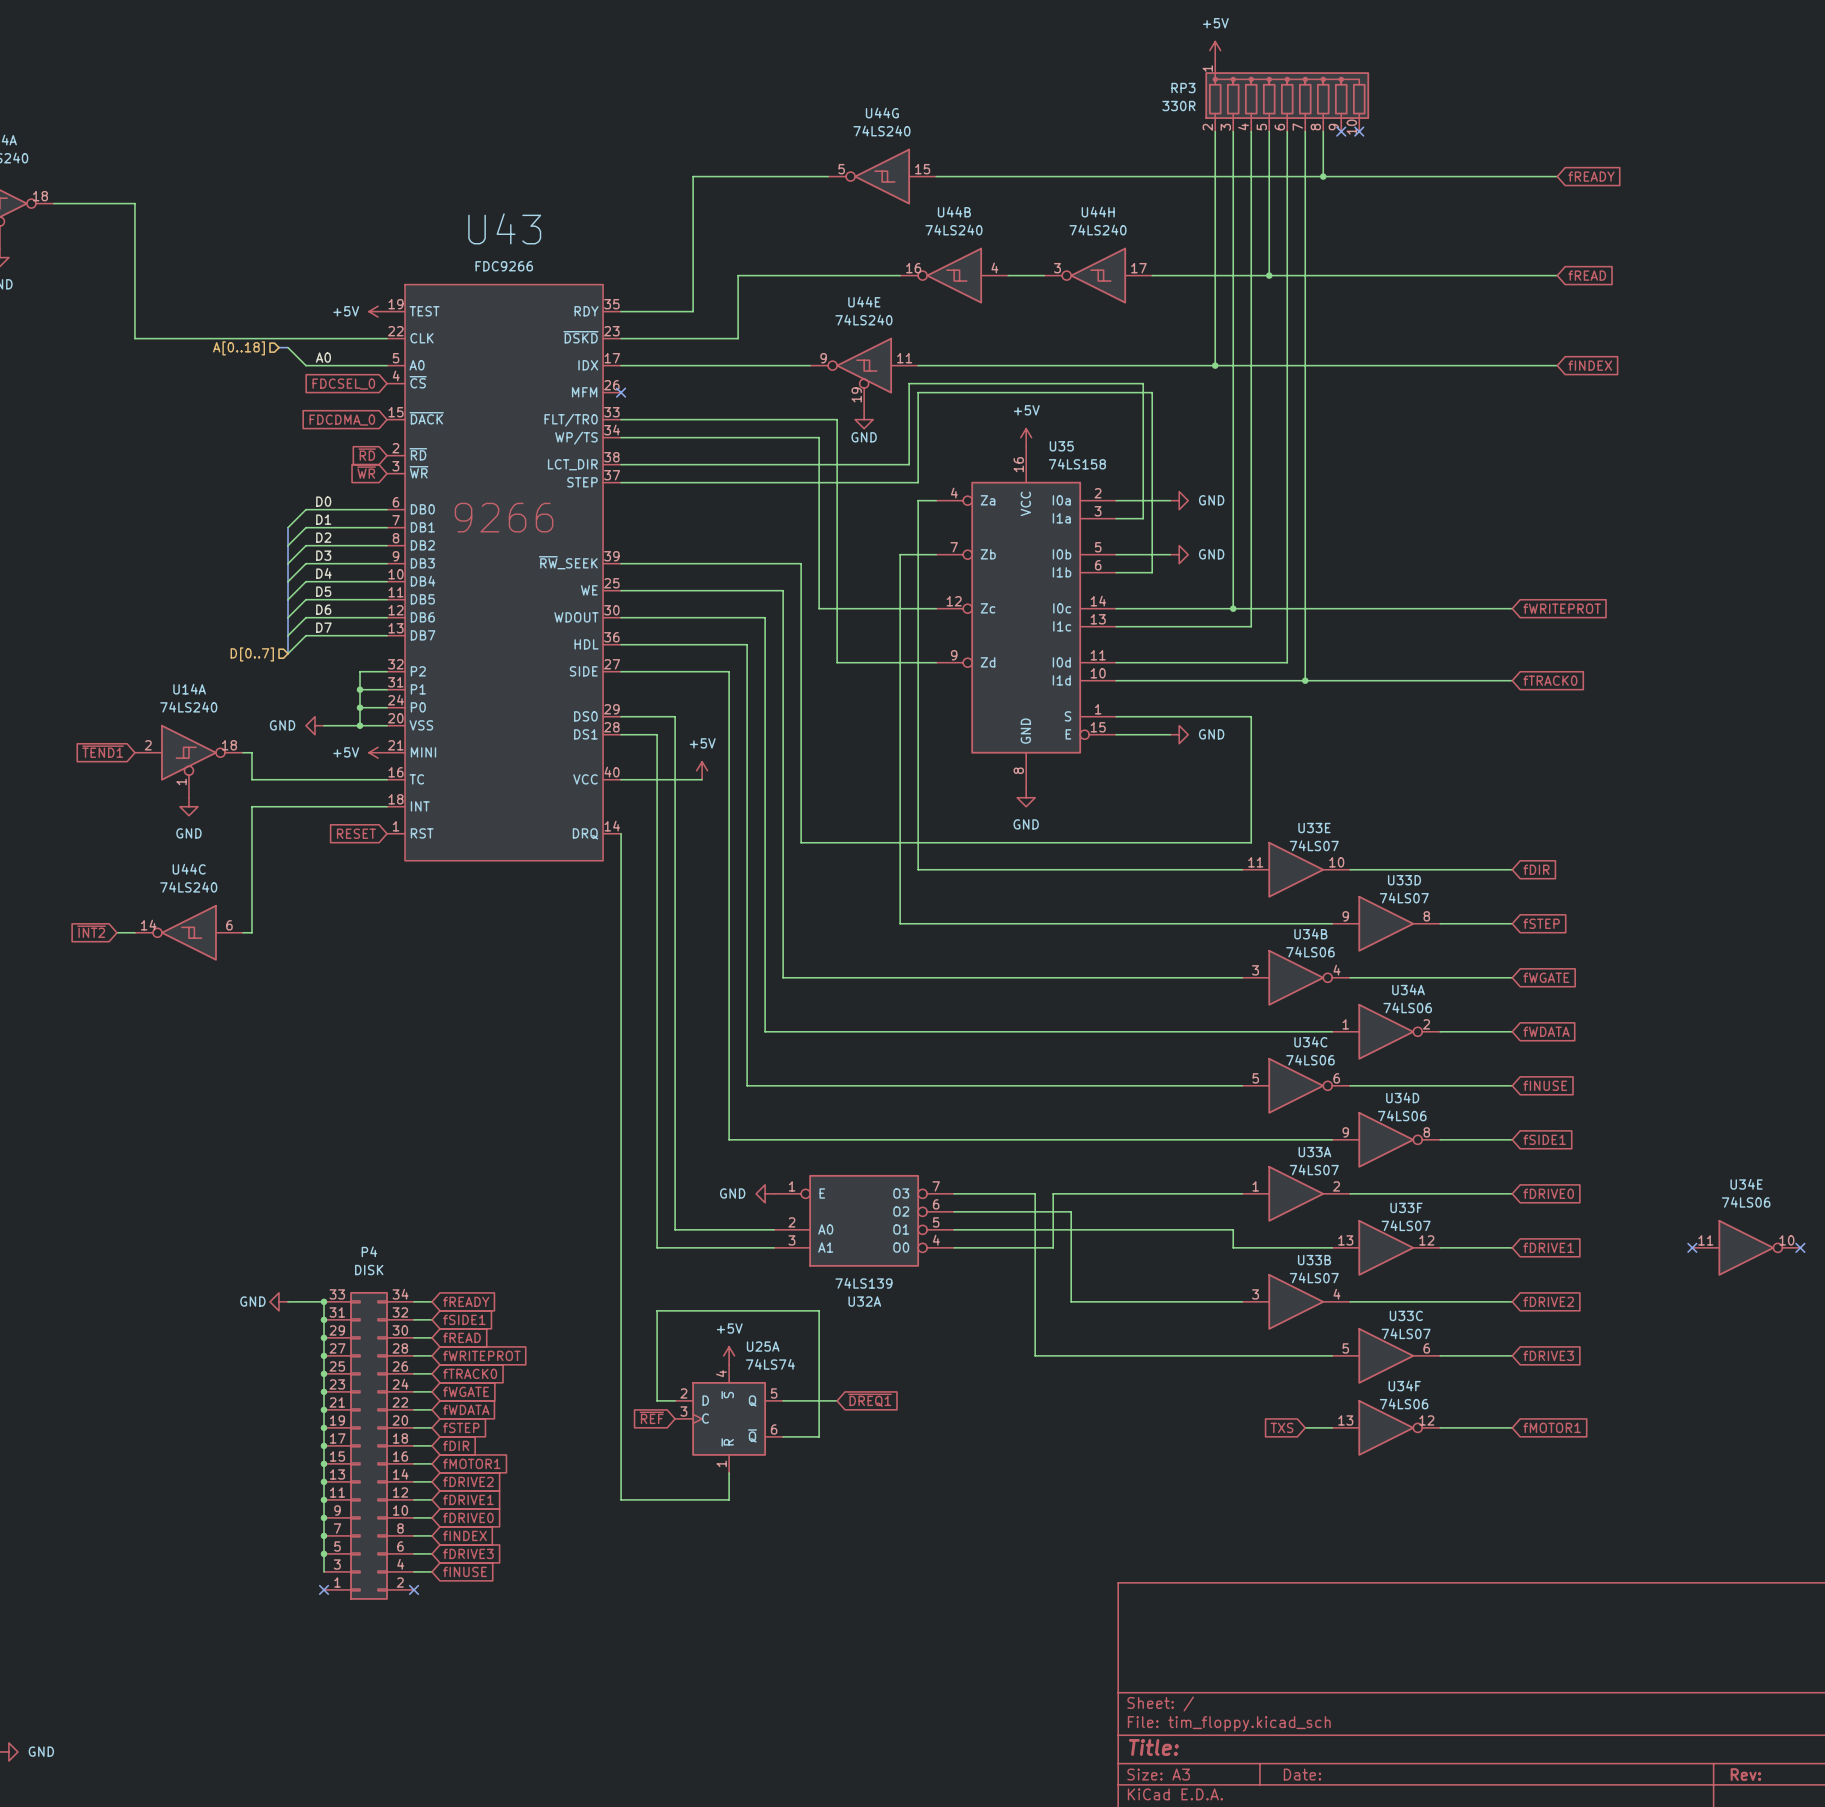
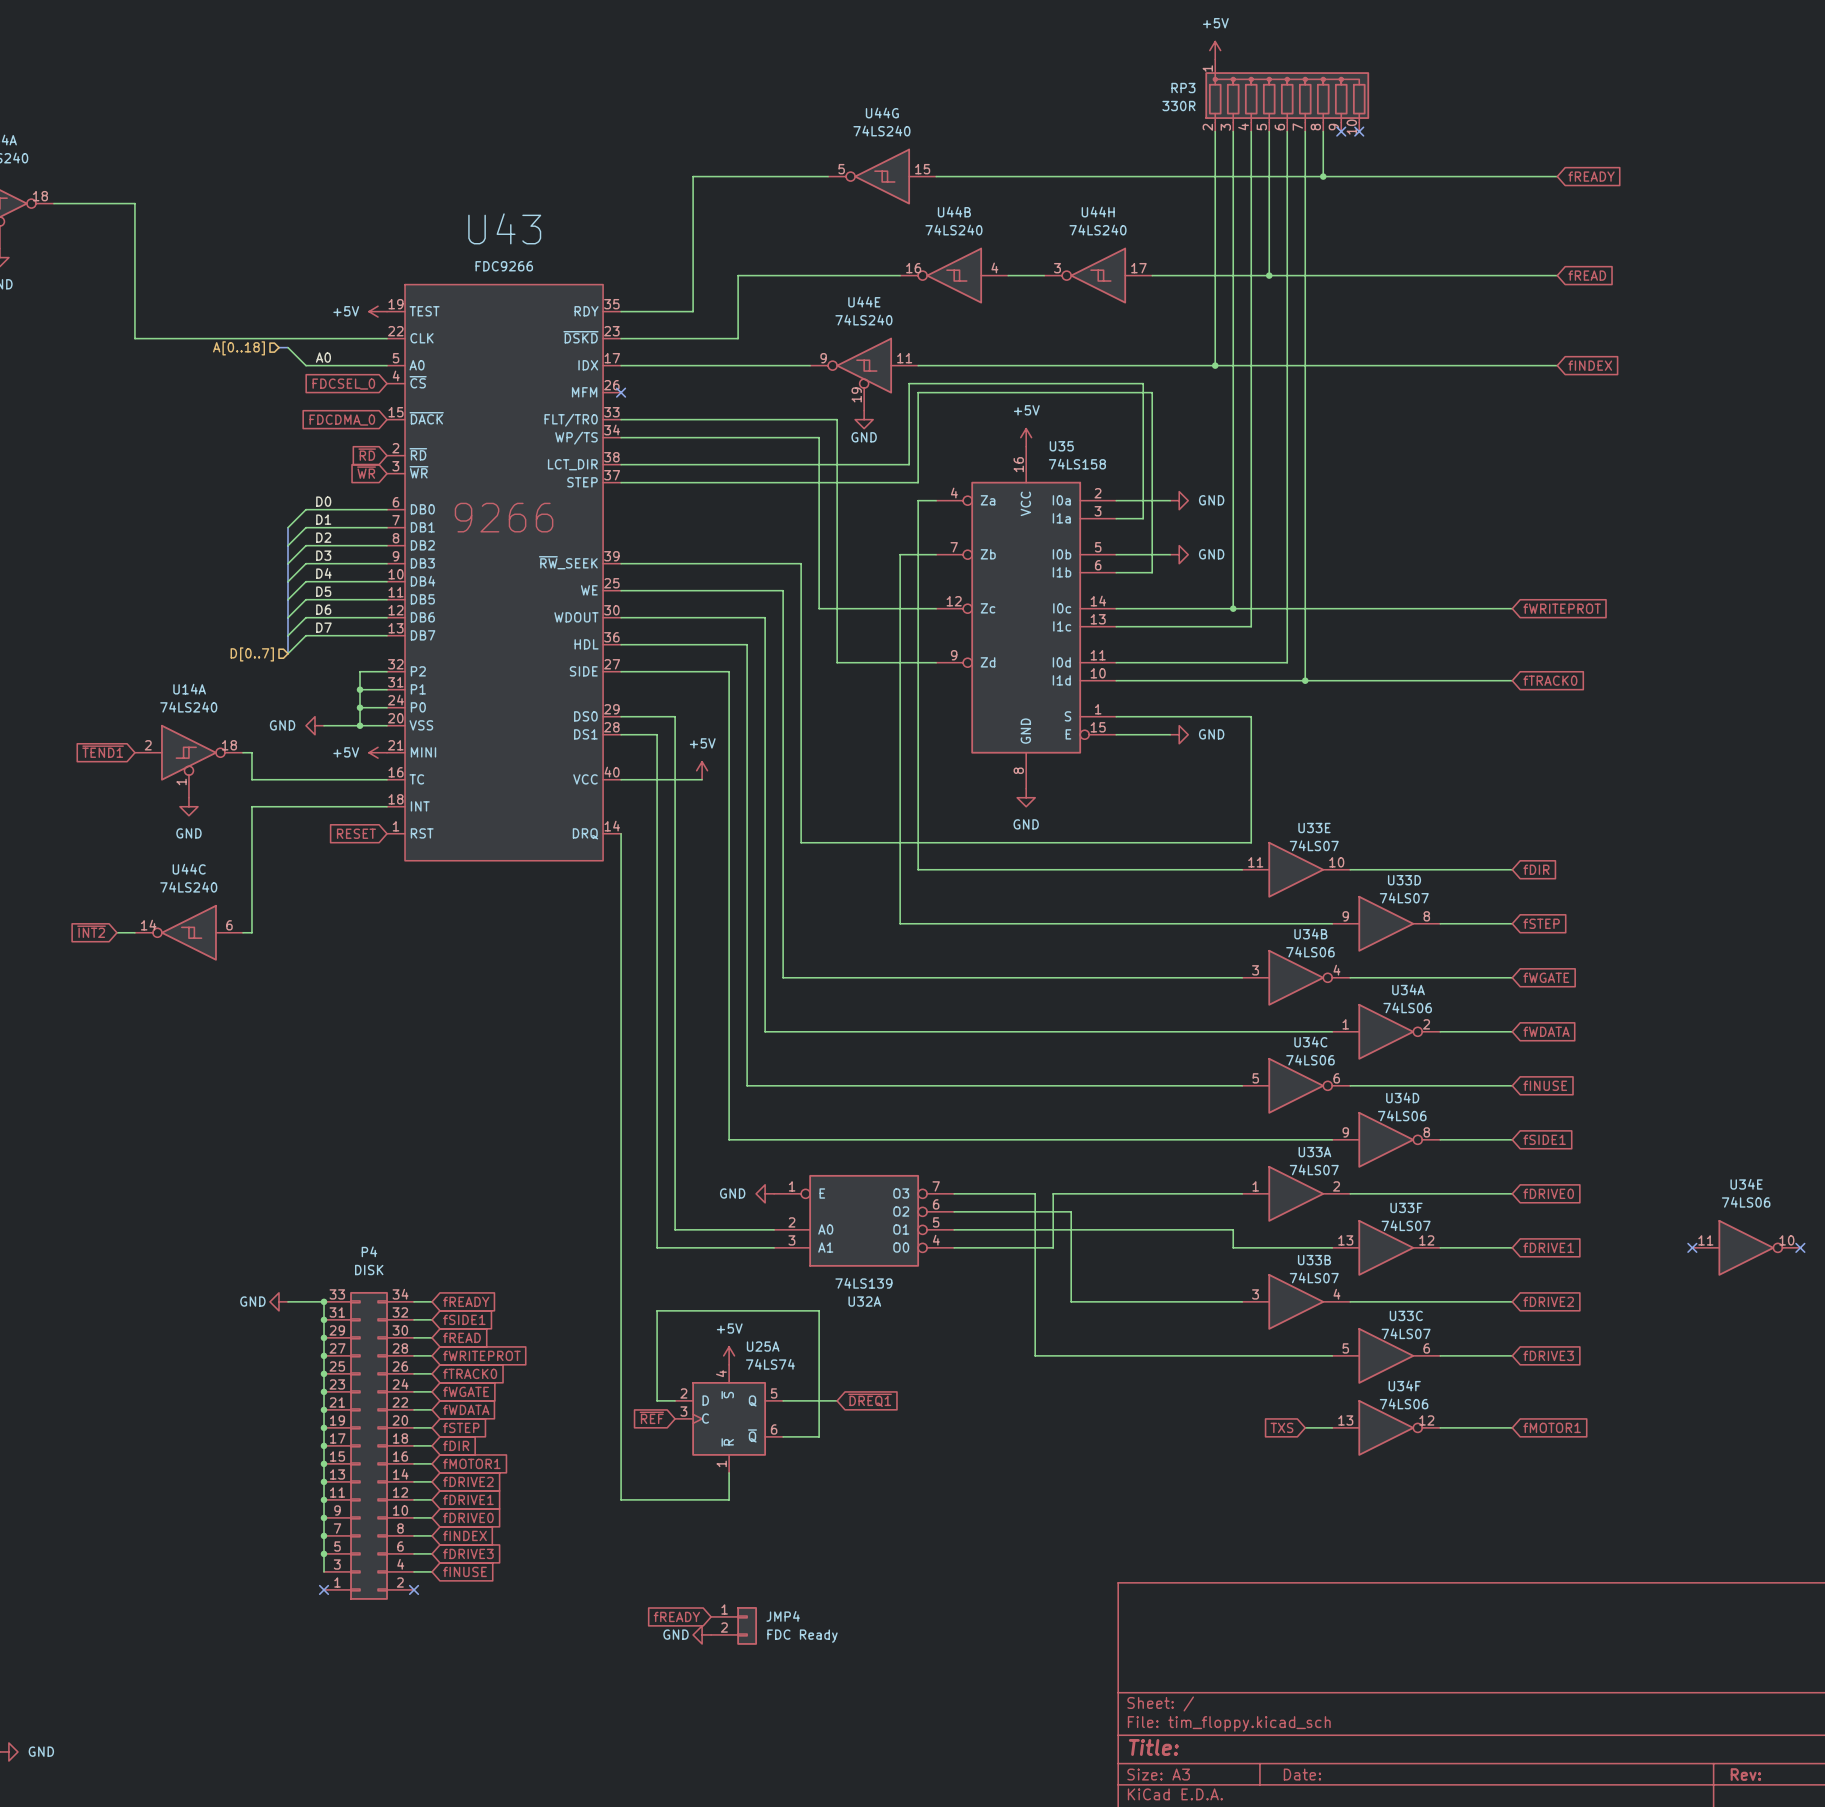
global label: none -> fREADY (676, 1616)
JMP4: none -> FDC Ready (734, 1625)
power symbol: none -> GND (702, 1634)

